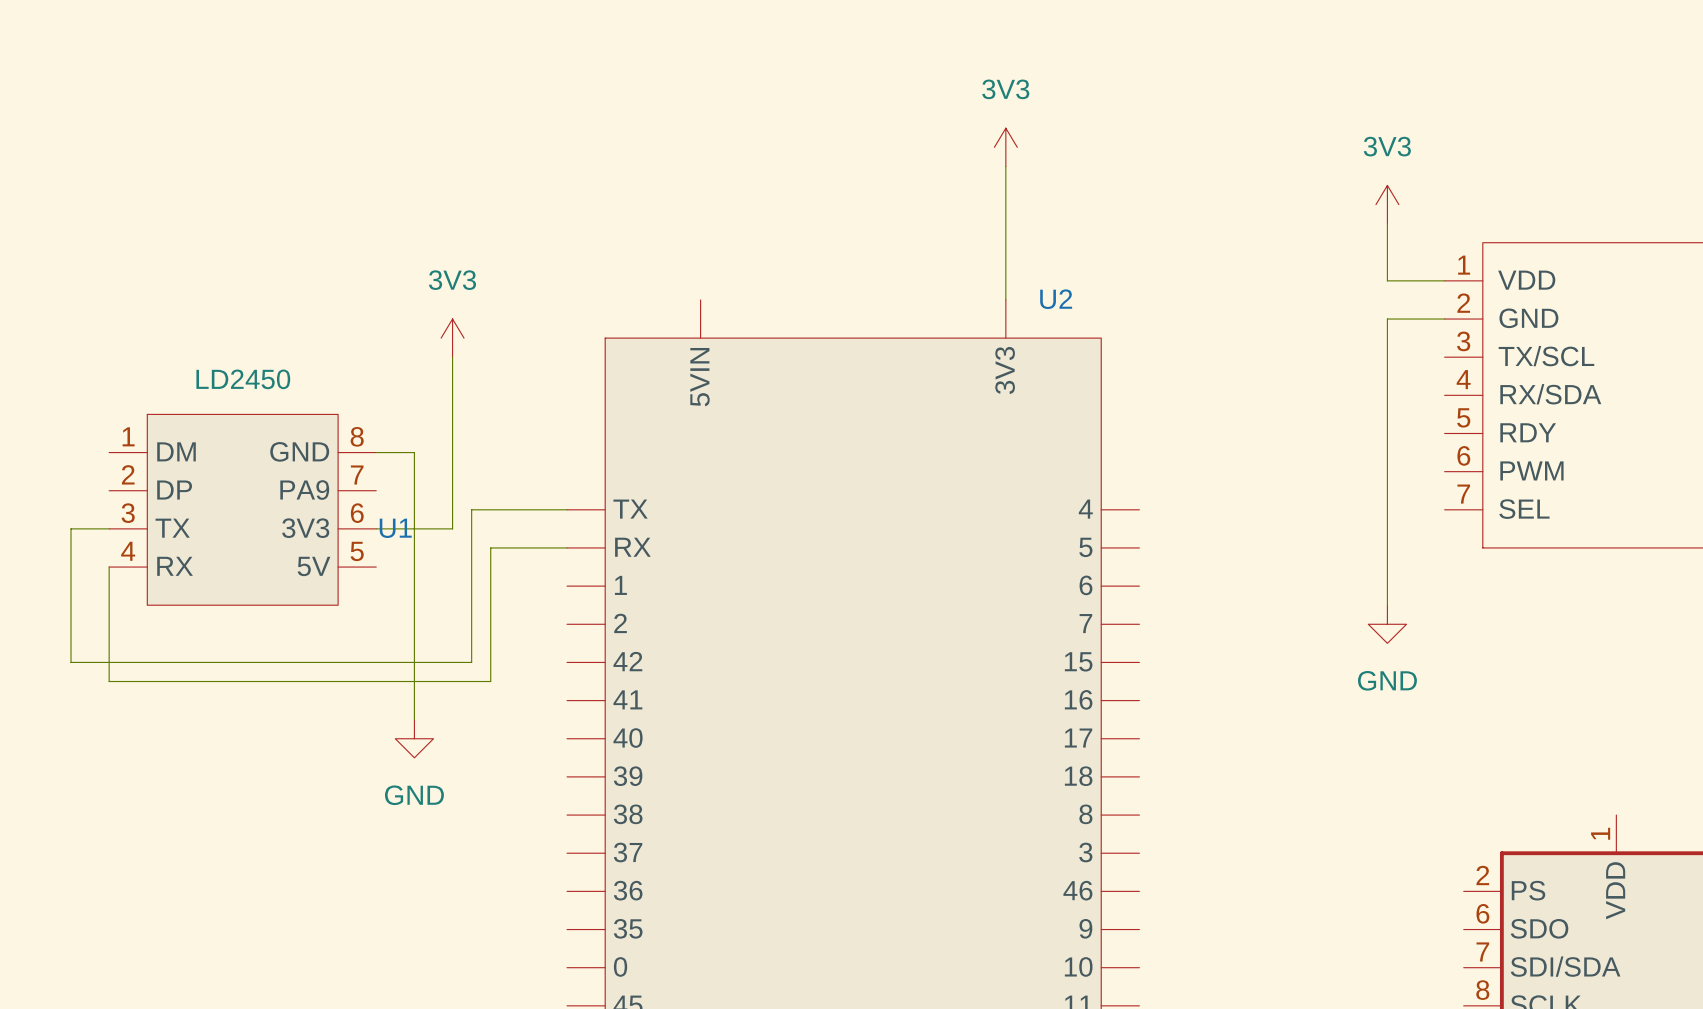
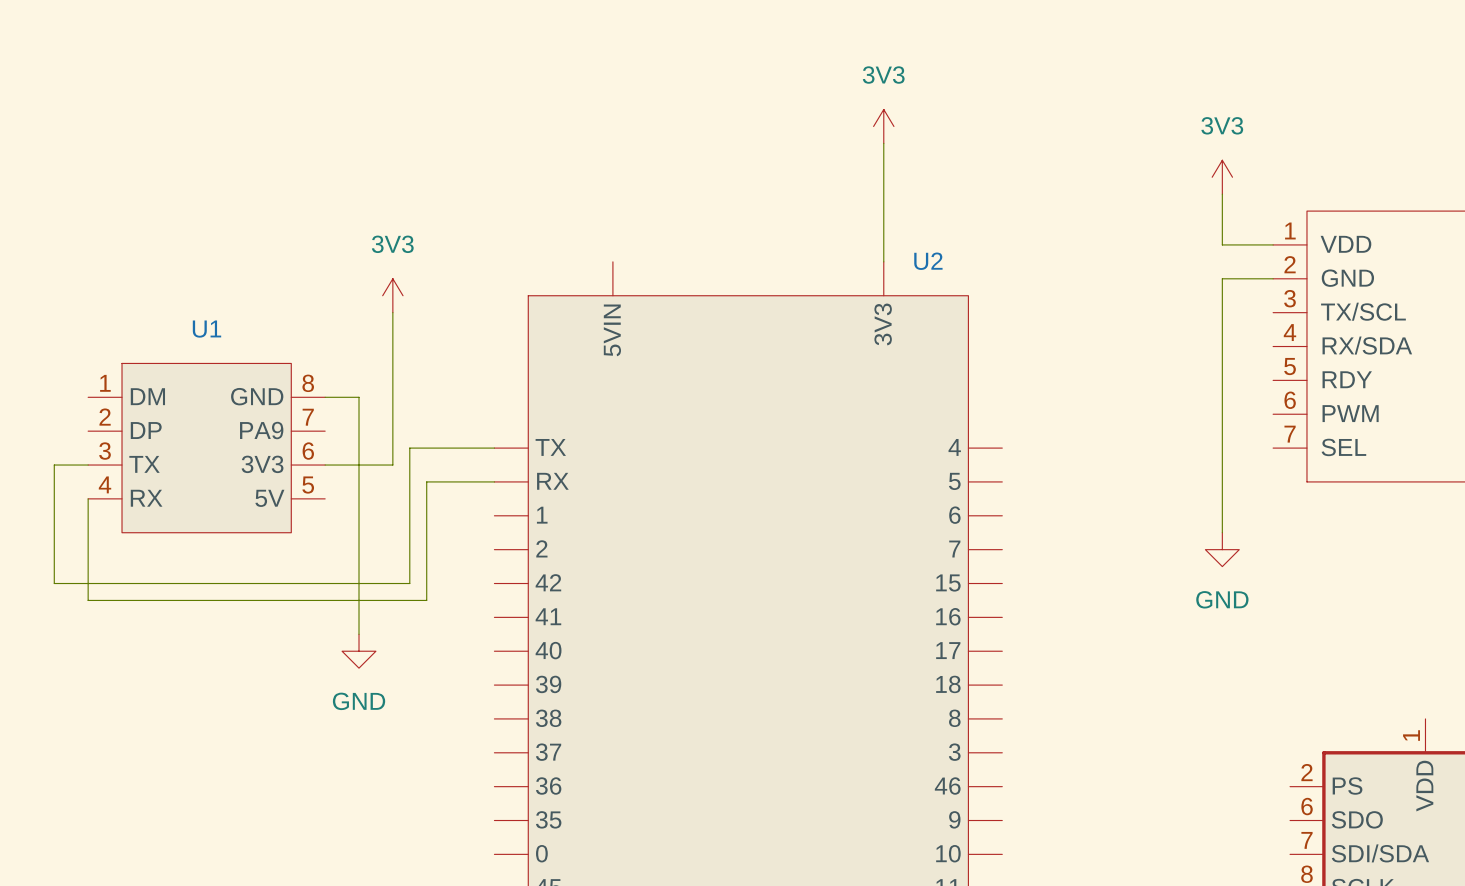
U1 value: LD2450 (243, 379) -> none
U1 name position: U1 (395, 528) -> U1 (206, 329)

